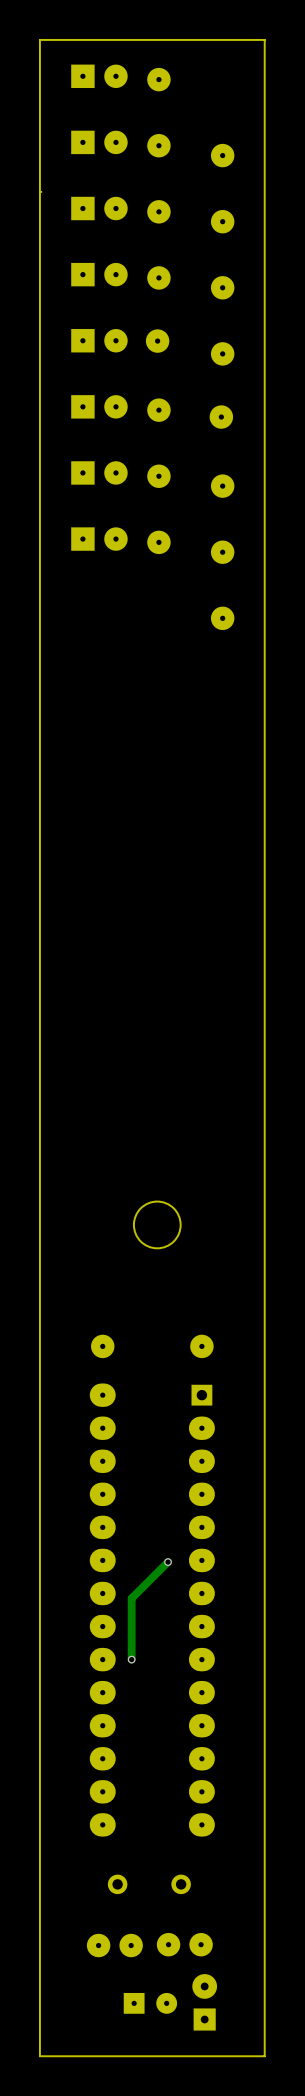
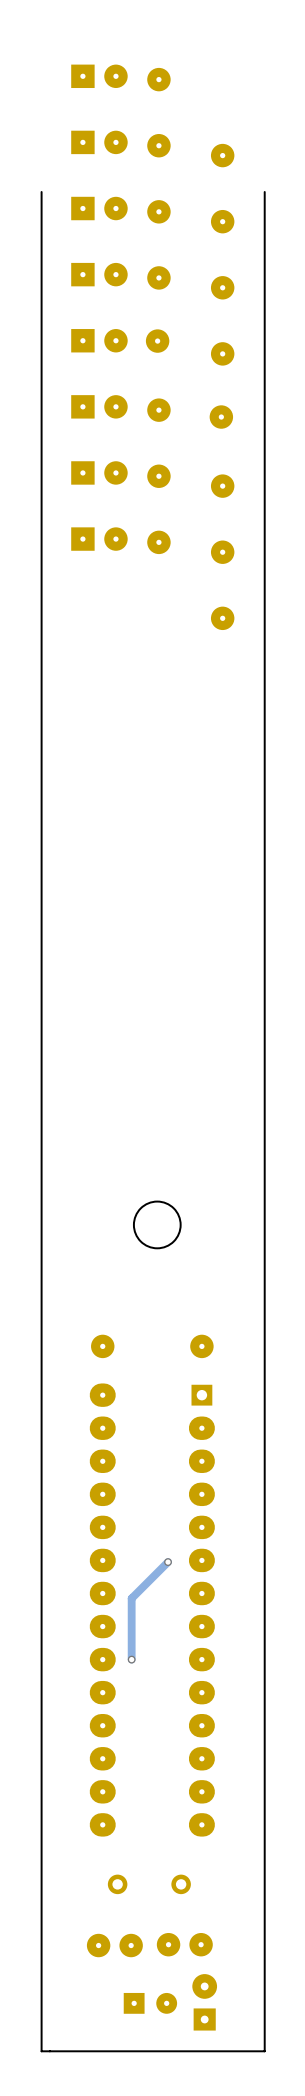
board edge: (264, 191) (264, 39) (39, 39) (39, 2056) (264, 2056) (264, 2051) -> (41, 191) (41, 2051) (264, 2051)

